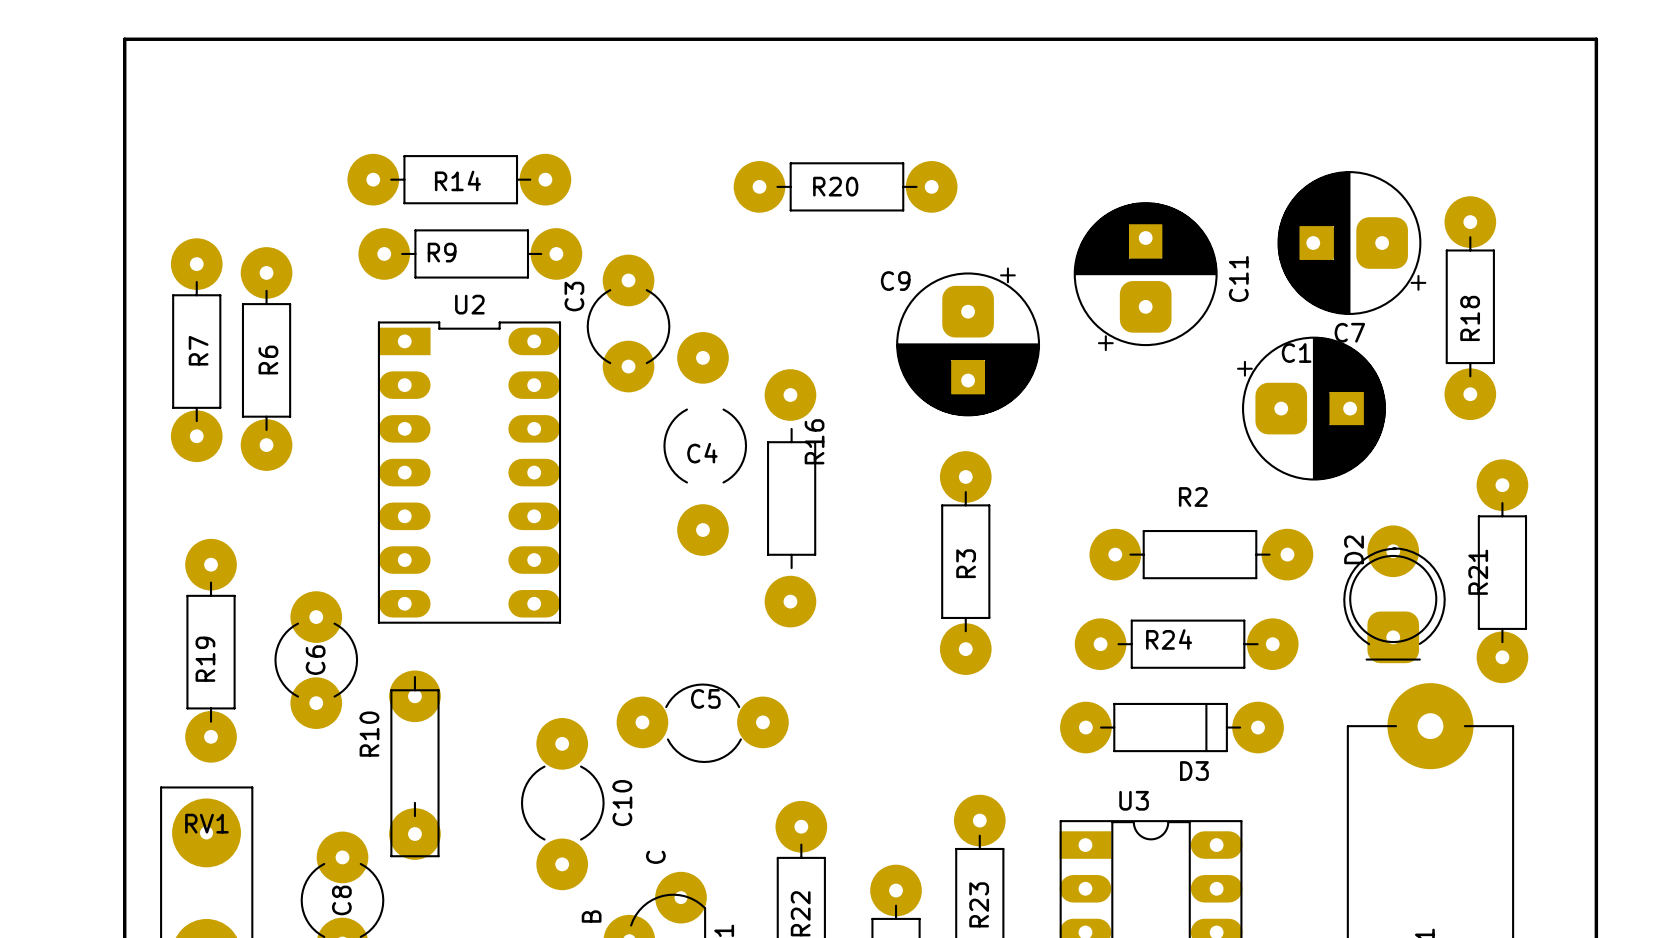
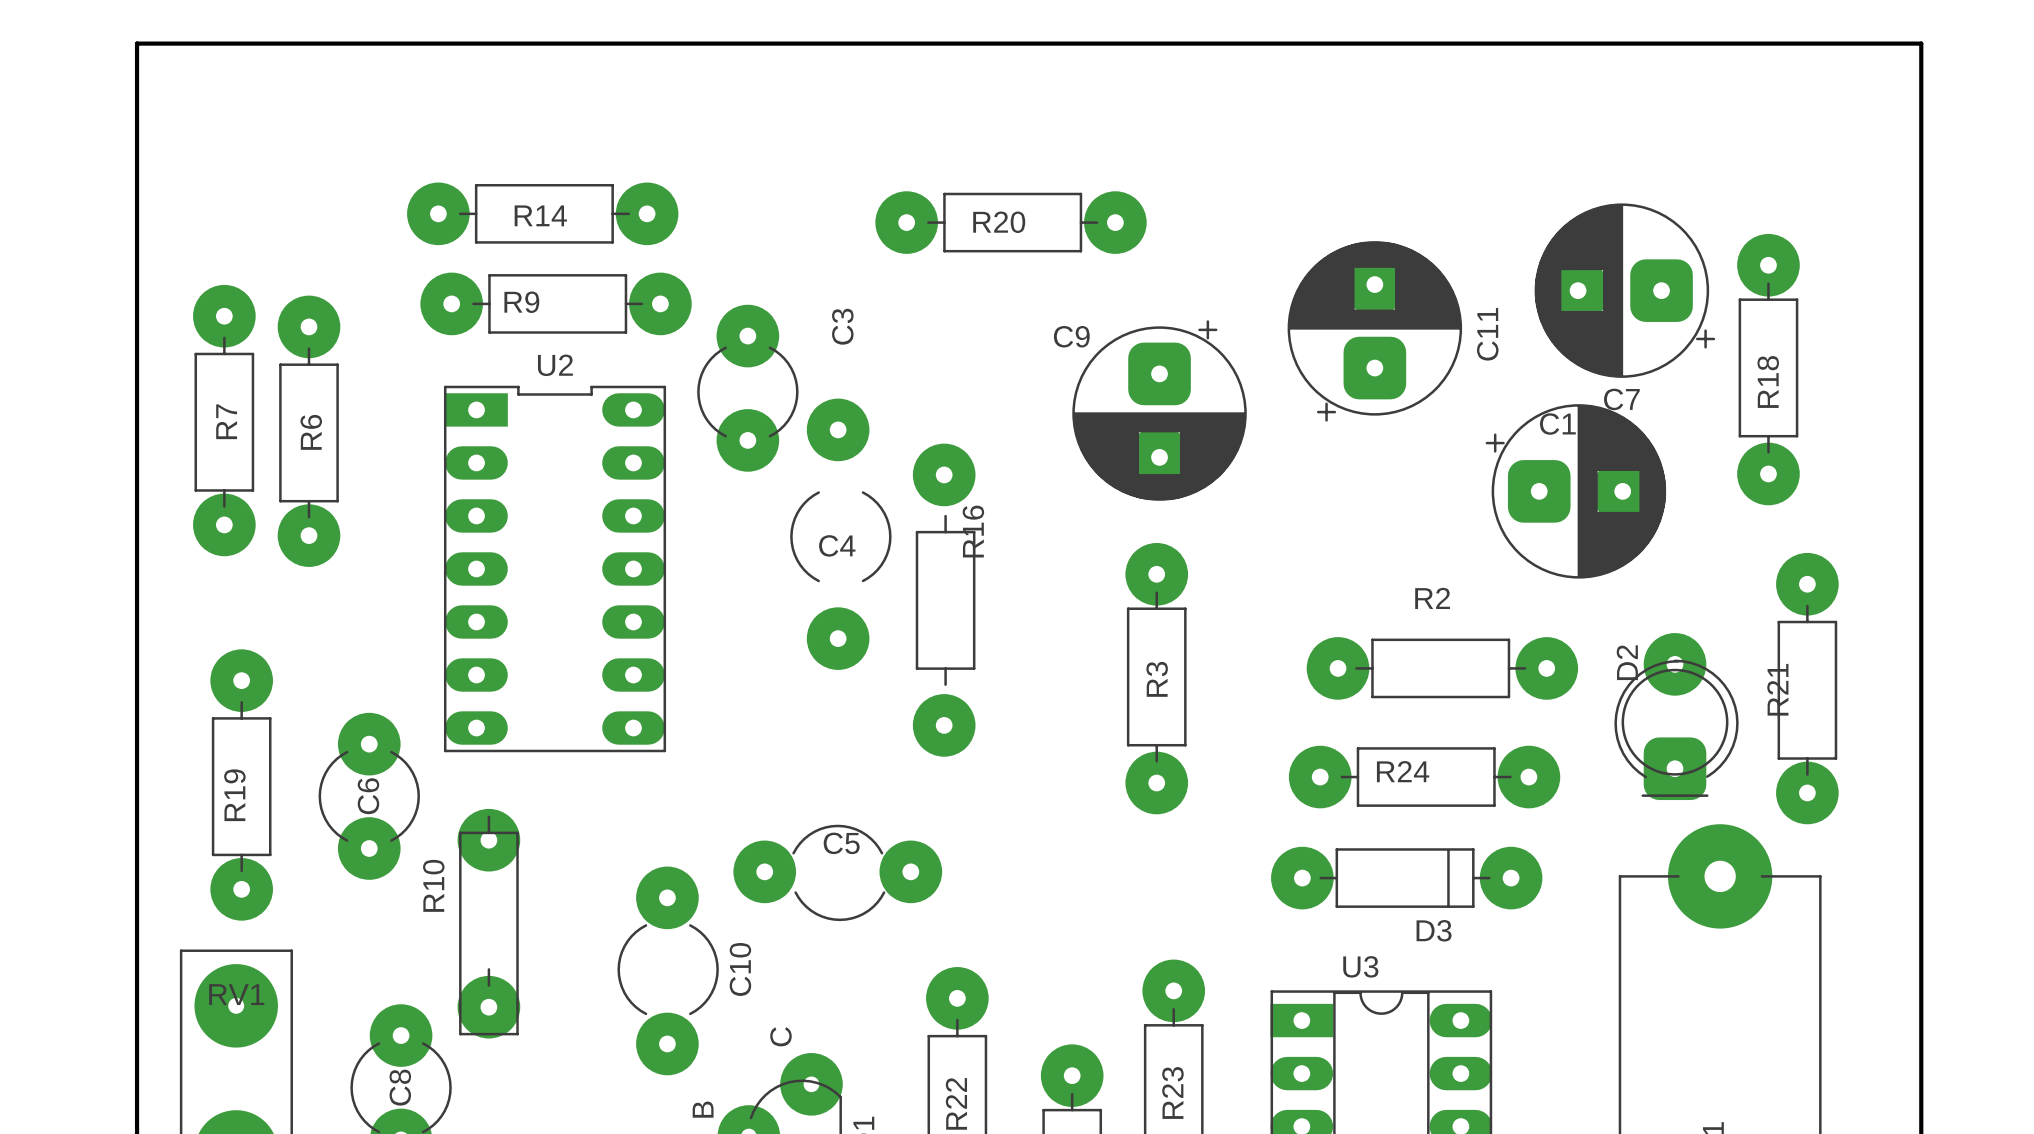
C3 name position: C3 (574, 296) -> C3 (842, 326)

